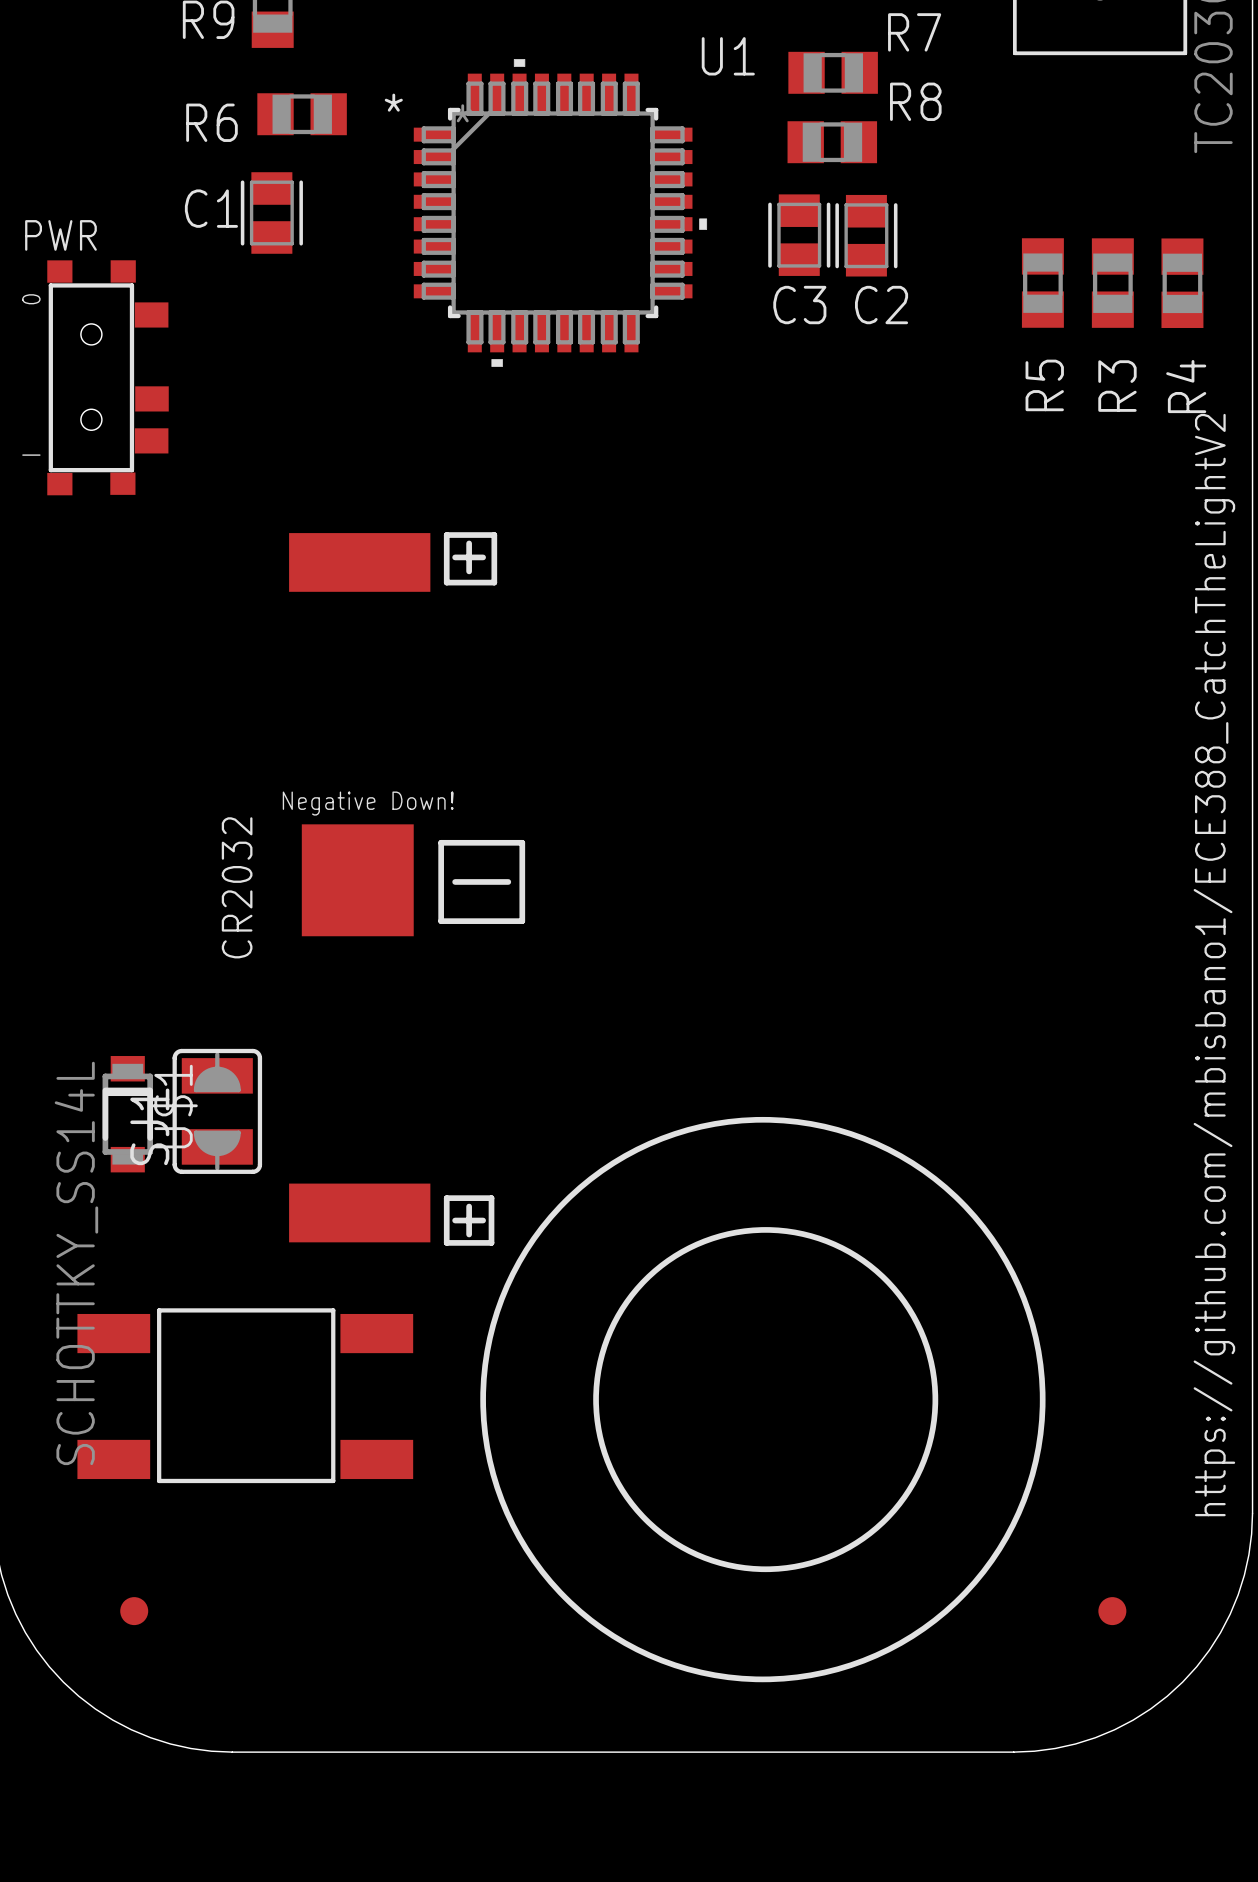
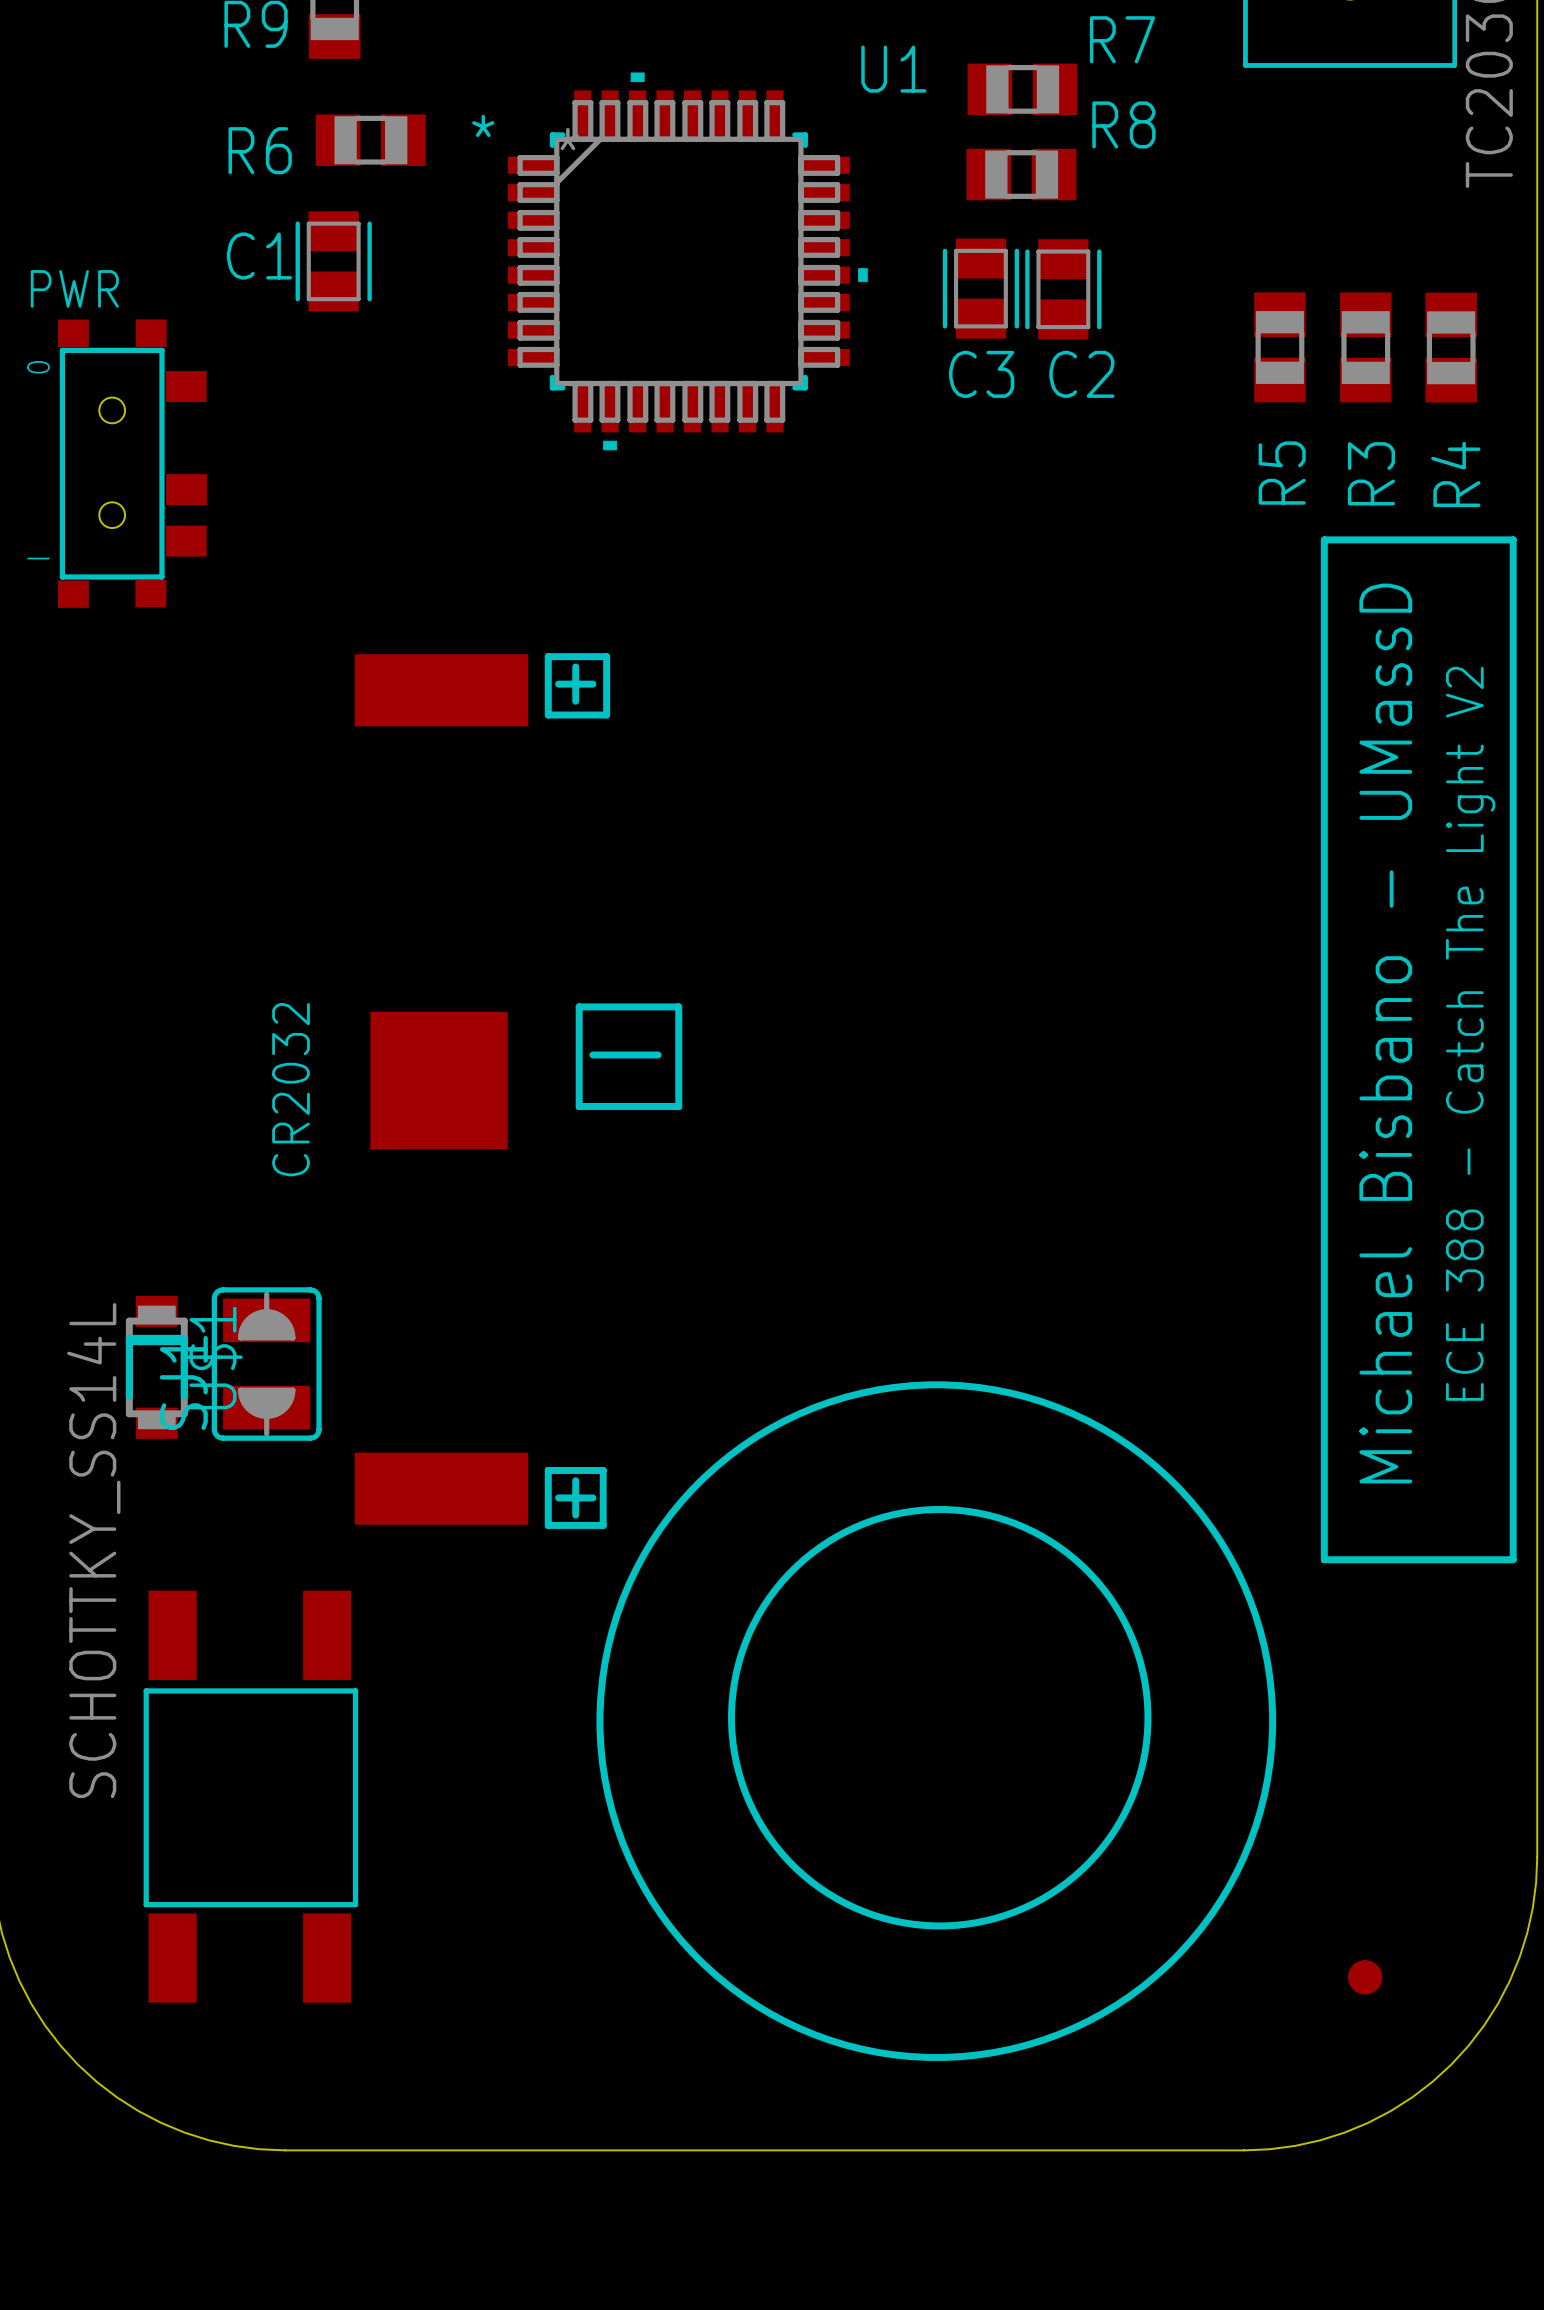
line: none -> (1324, 539) (1324, 1559) (1513, 1559) (1513, 539) (1324, 539)
text: Negative Down! (368, 803) -> none
line: none -> (579, 1006) (579, 1106) (678, 1106) (678, 1006) (579, 1006)
line: (441, 842) (441, 921) (522, 921) (522, 842) (441, 842) -> none
text: none -> Michael Bisbano - UMassD (1385, 1033)
text: none -> ECE 388 - Catch The Light V2 (1470, 1033)
line: (455, 881) (508, 881) -> (592, 1054) (658, 1054)
text: https://github.com/mbisbano1/ECE388_CatchTheLightV2 (1214, 965) -> none
drawing shape: [480, 1116, 1046, 1683] -> [596, 1381, 1277, 2061]
part rotation: 0° (245, 1395) -> 90° clockwise (250, 1796)
part: (134, 1611) -> none

